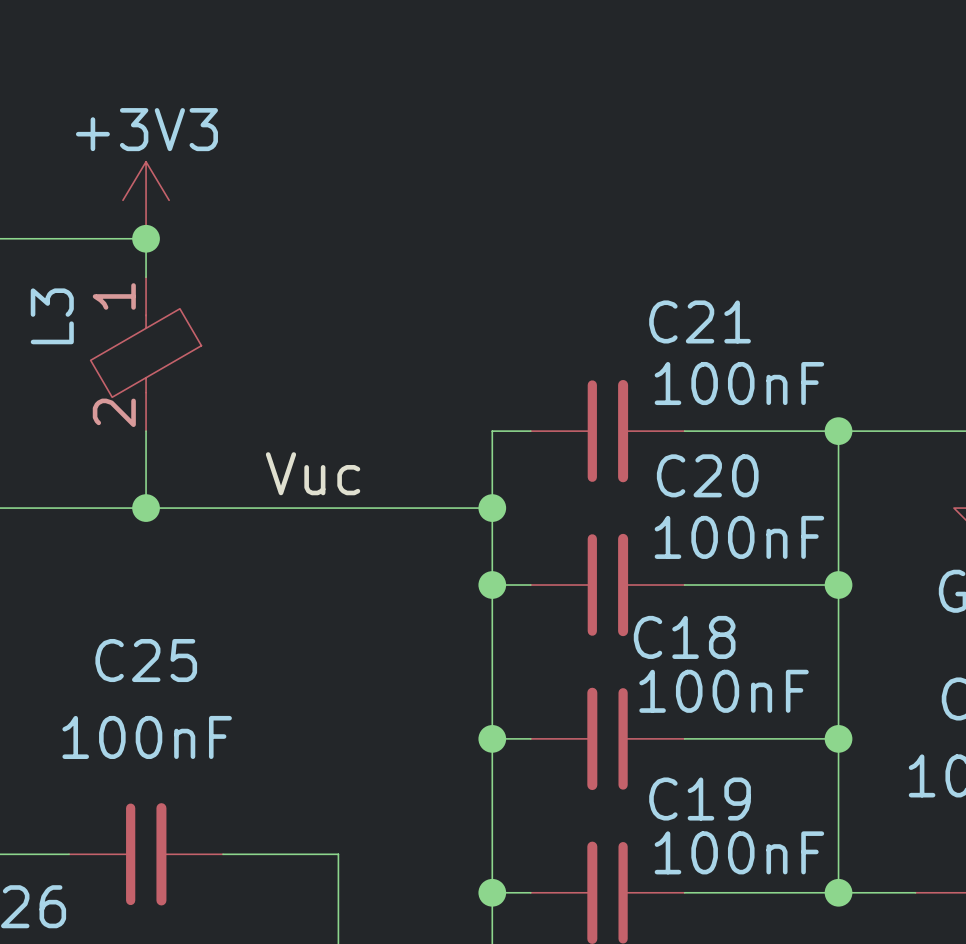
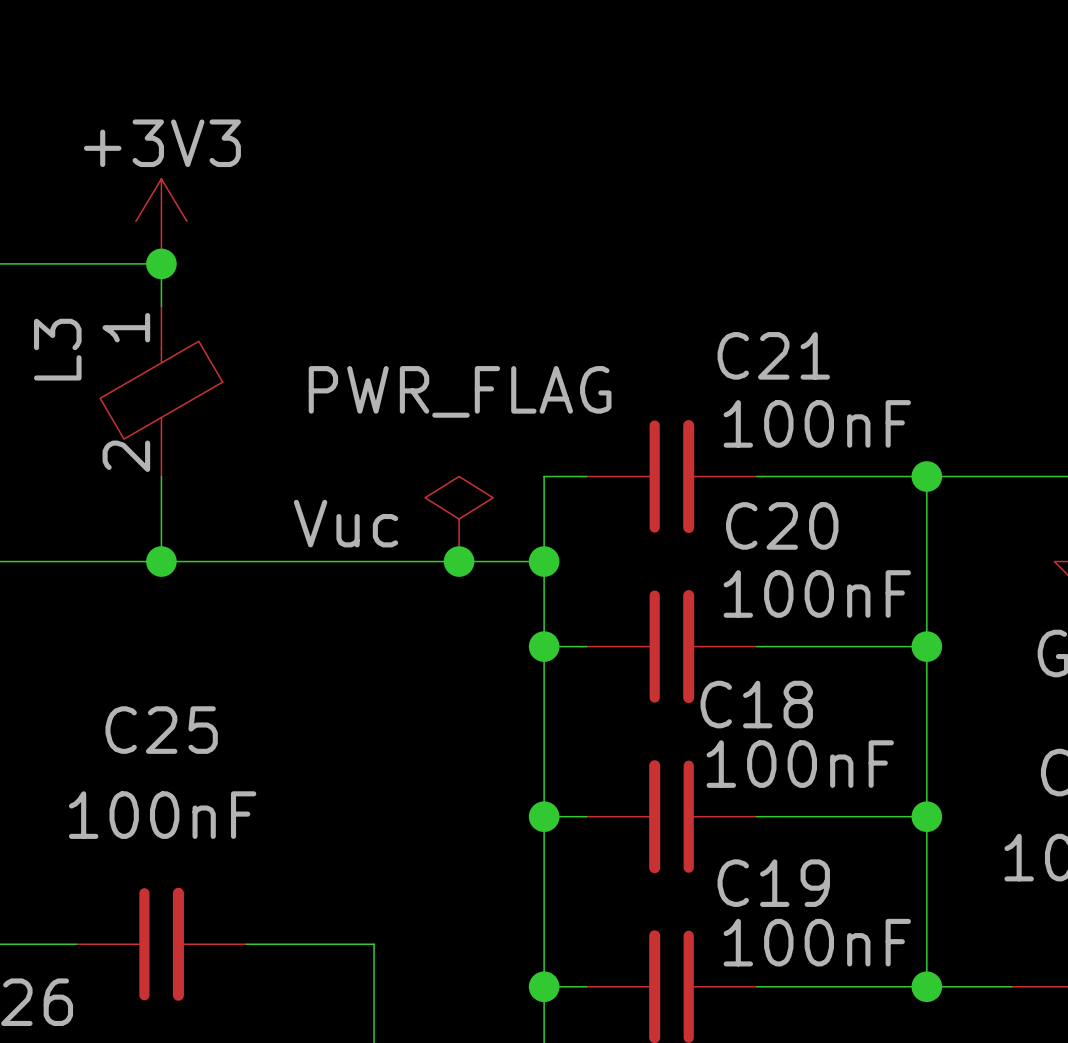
power symbol: none -> PWR_FLAG (459, 519)
junction: none -> (459, 561)

